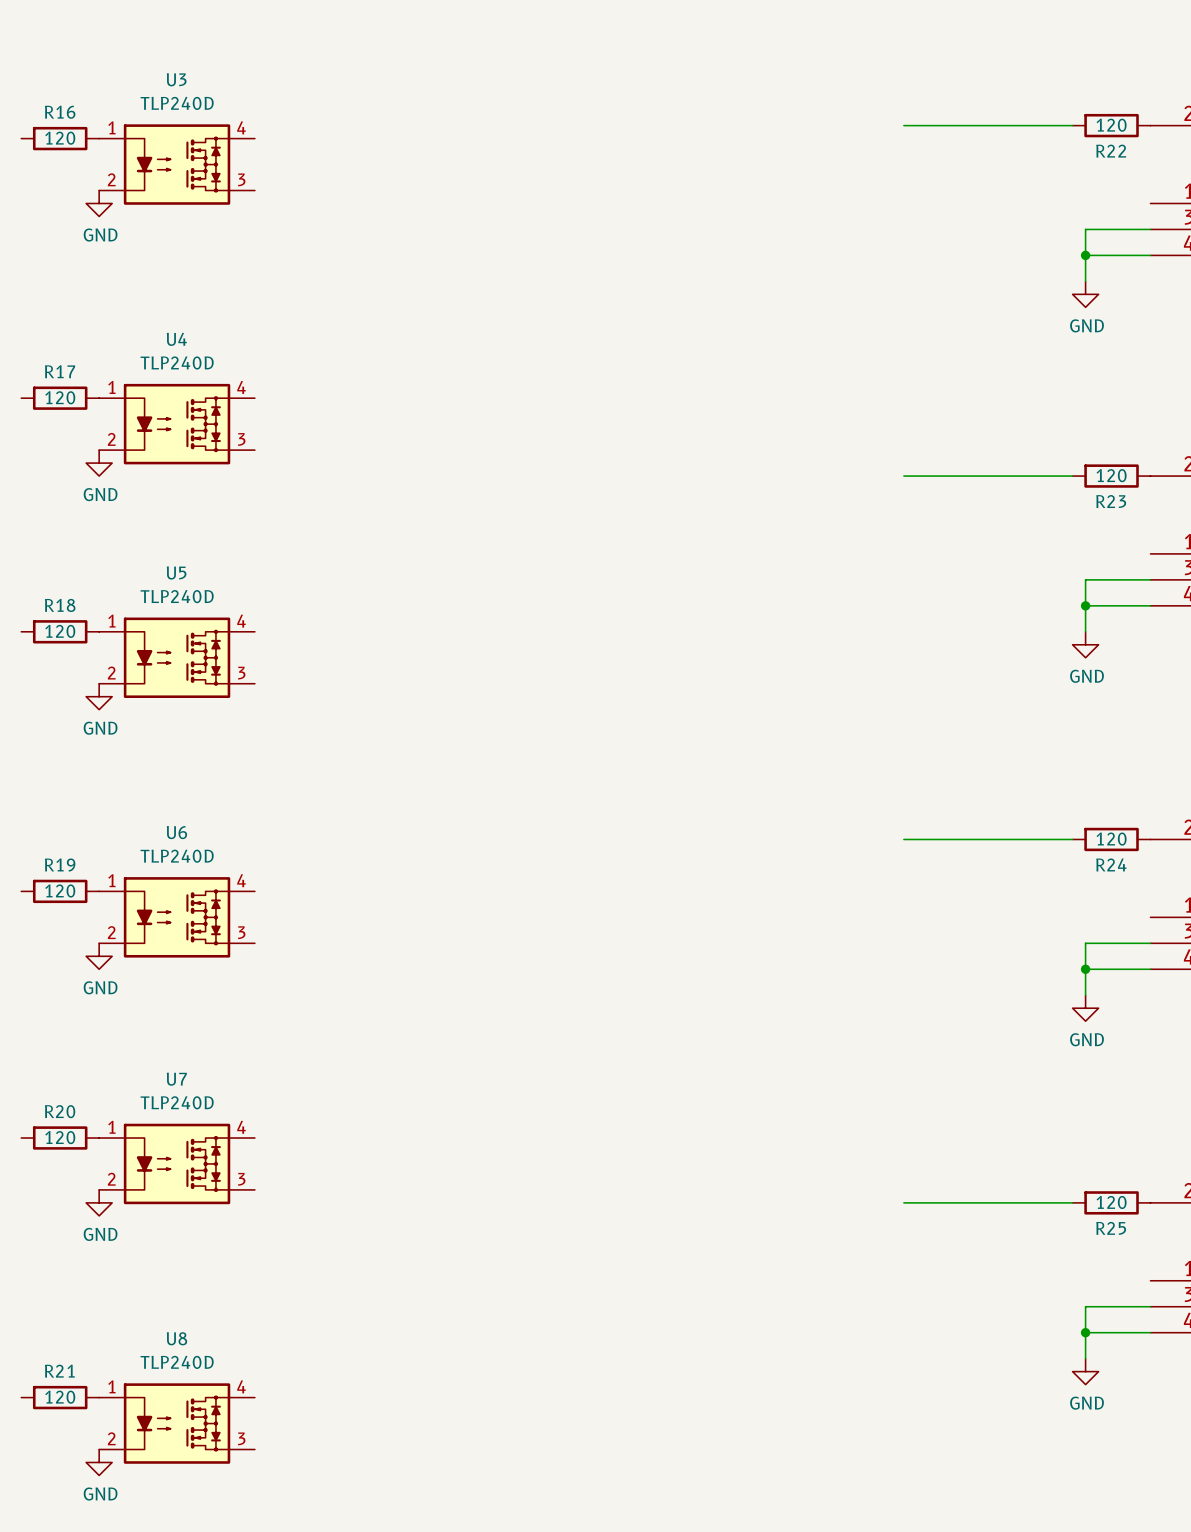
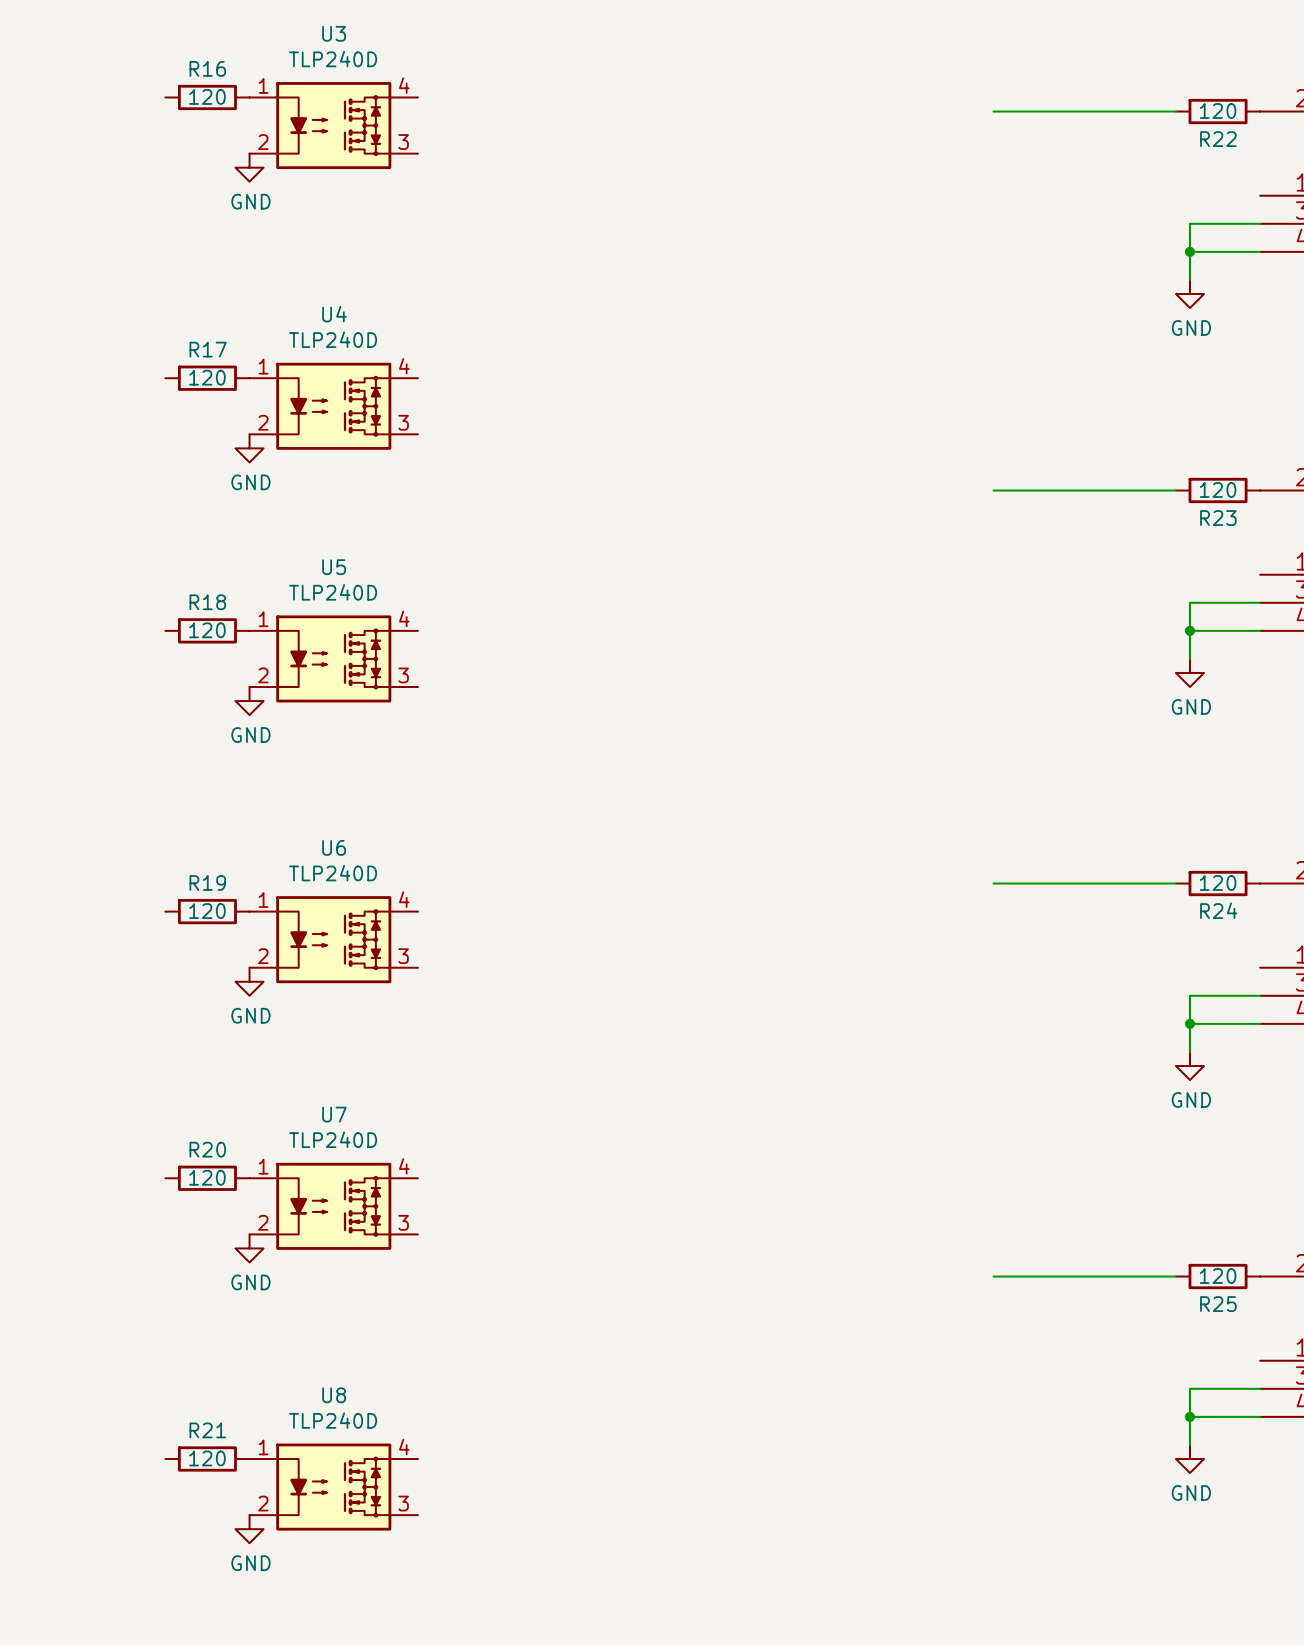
R16 position: (60, 138) -> (207, 97)
U3 position: (177, 164) -> (333, 125)
power symbol position: GND (99, 203) -> GND (249, 167)
R17 position: (60, 398) -> (207, 378)
U4 position: (177, 424) -> (333, 406)
power symbol: none -> GND (249, 448)
power symbol: GND (99, 463) -> none
R18 position: (60, 631) -> (207, 630)
U5 position: (177, 657) -> (333, 658)
power symbol: none -> GND (249, 701)
power symbol: GND (99, 696) -> none
R19 position: (60, 891) -> (207, 911)
U6 position: (177, 917) -> (333, 939)
power symbol position: GND (99, 956) -> GND (249, 981)
R20 position: (60, 1138) -> (207, 1178)
U7 position: (177, 1163) -> (333, 1206)
power symbol position: GND (99, 1202) -> GND (249, 1248)
R21 position: (60, 1397) -> (207, 1459)
U8 position: (177, 1423) -> (333, 1487)
power symbol position: GND (99, 1462) -> GND (249, 1529)

